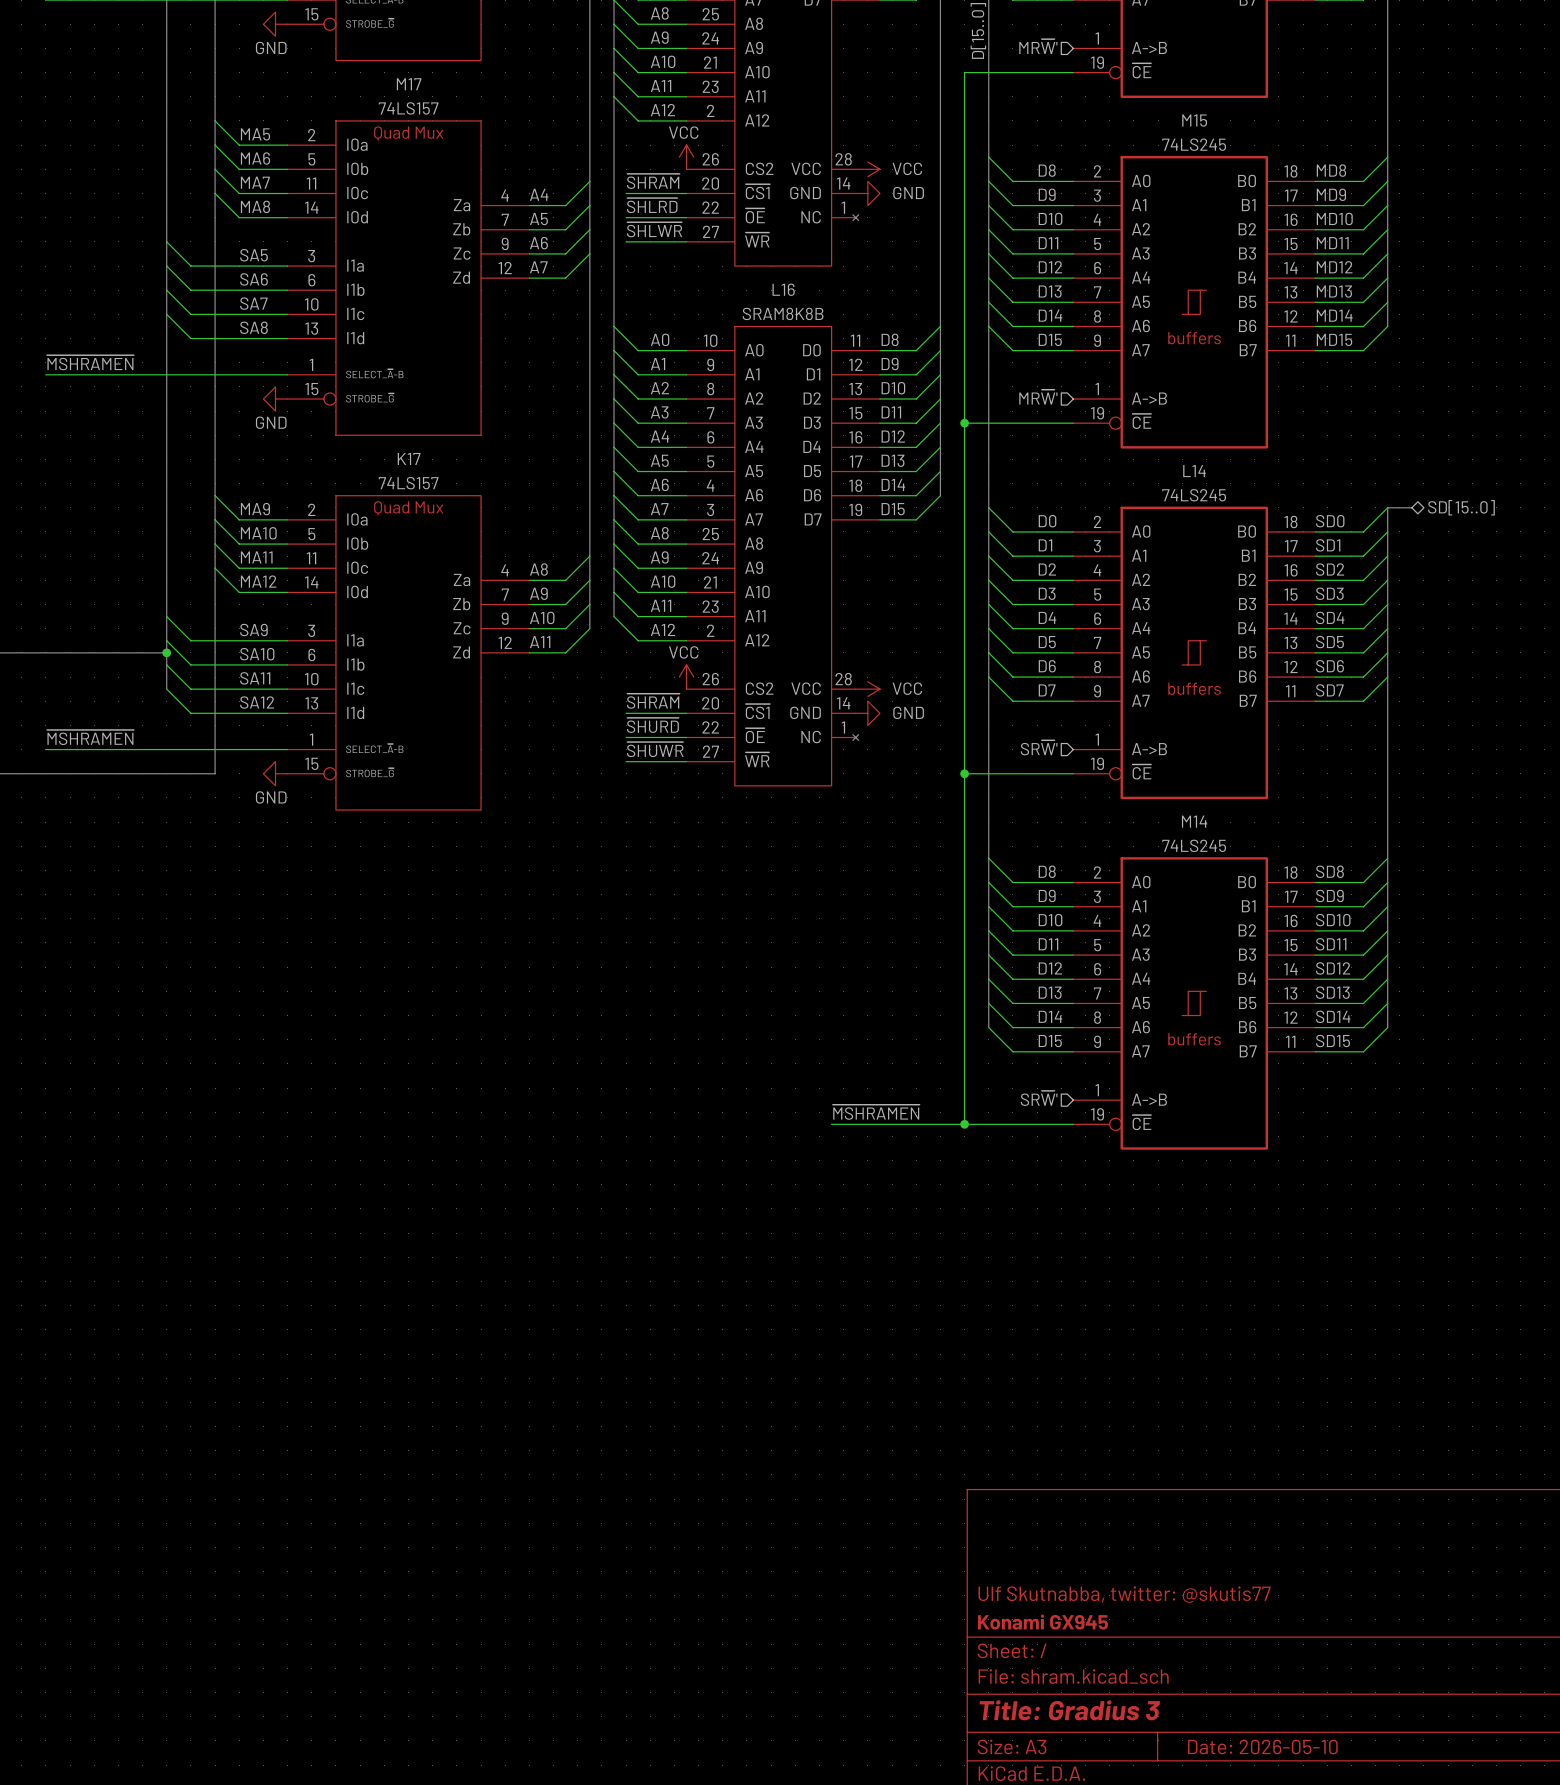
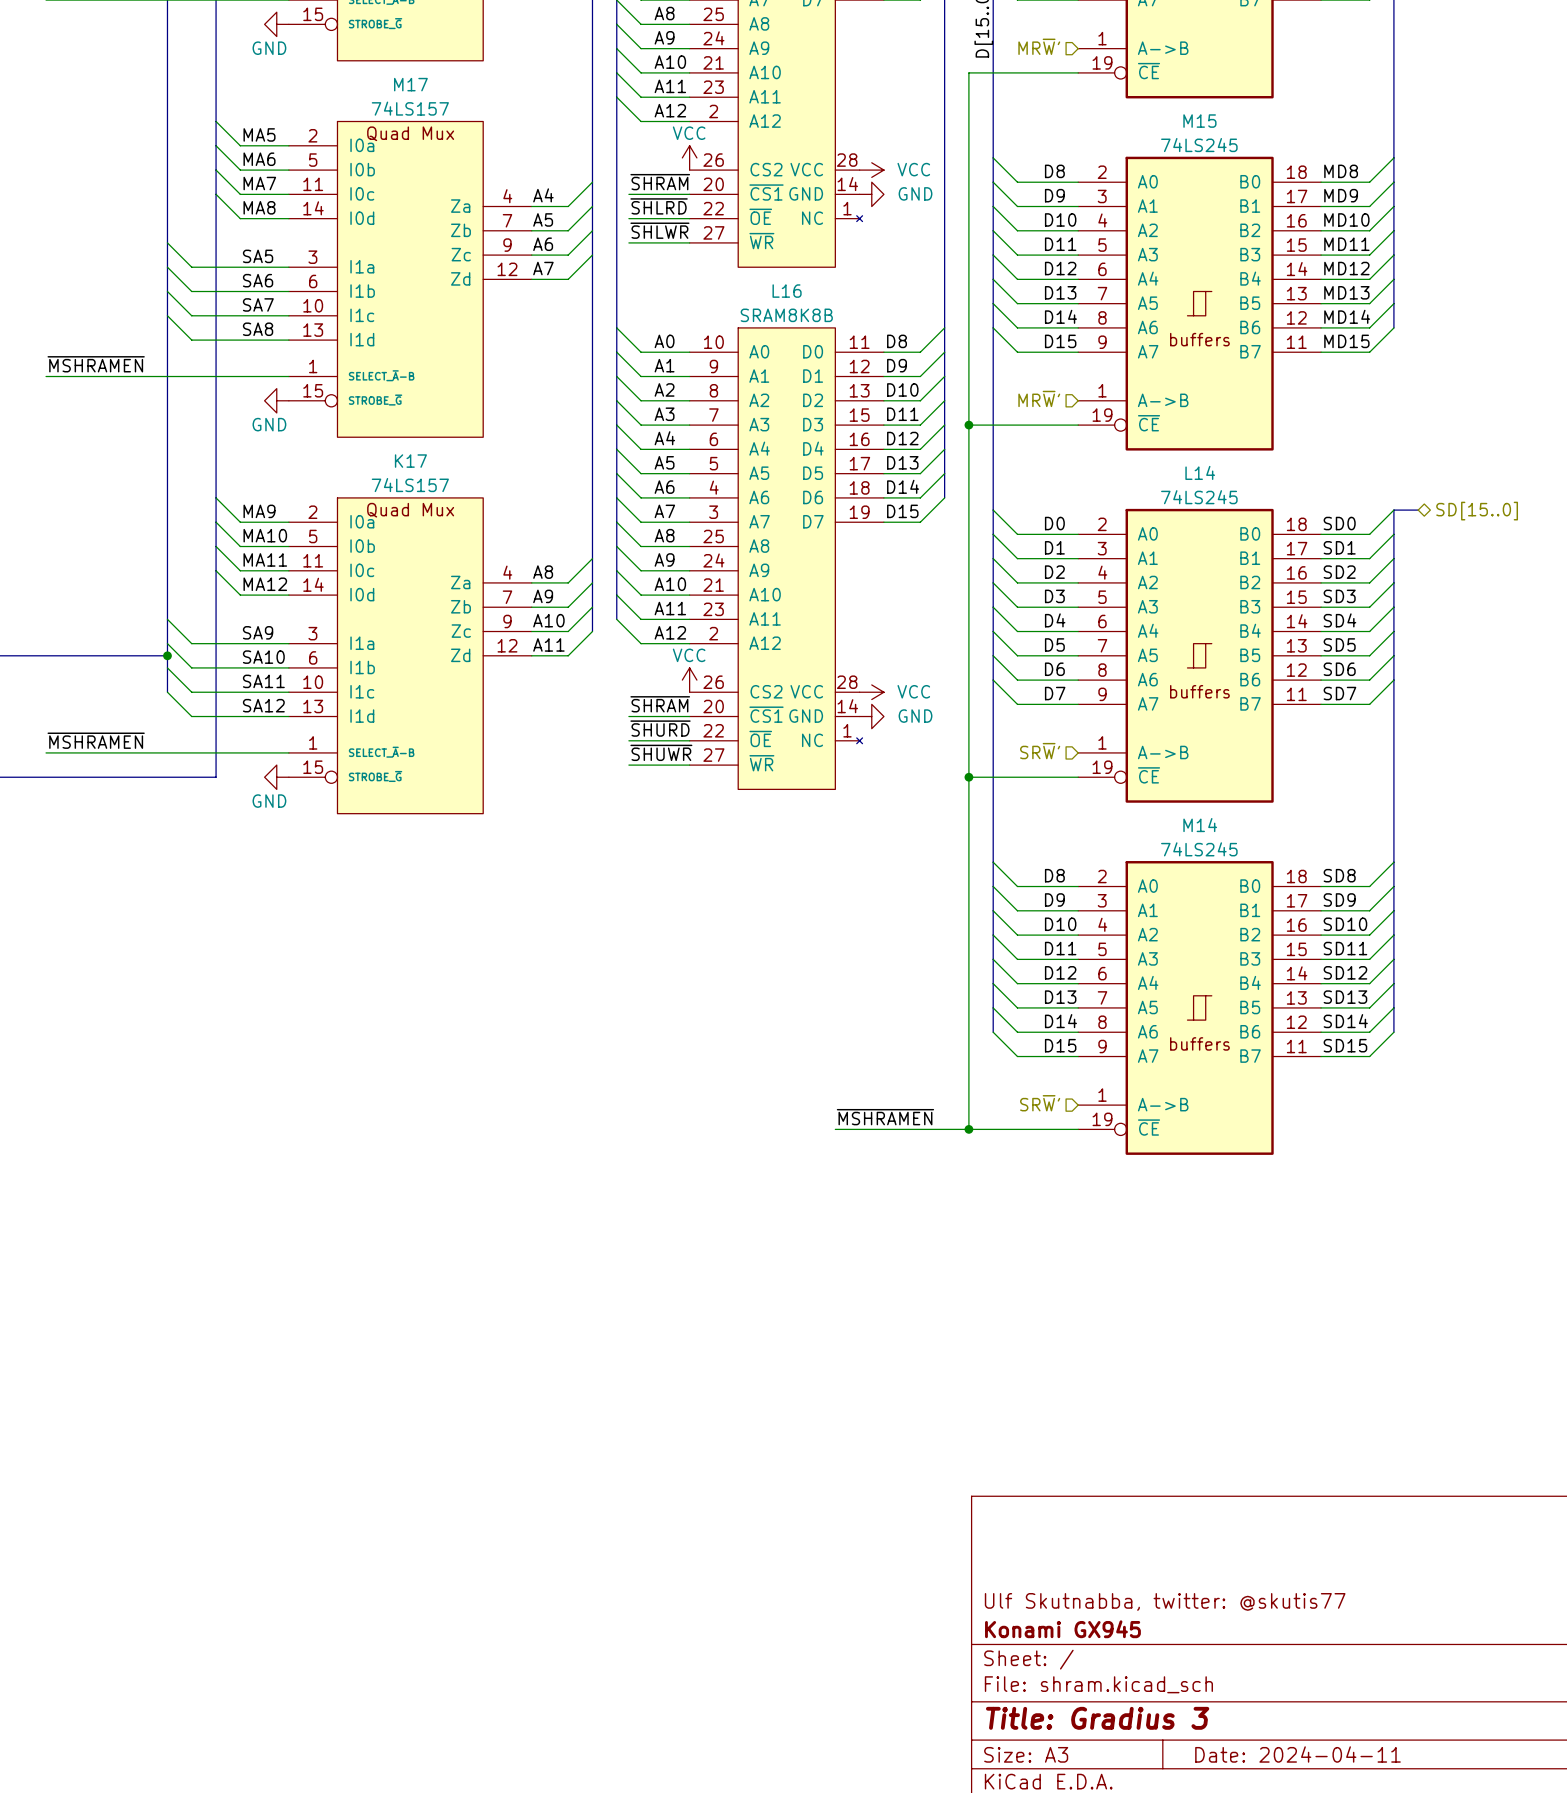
title block: Date: 2026-05-10 (1262, 1746) -> Date: 2024-04-11 (1297, 1754)

